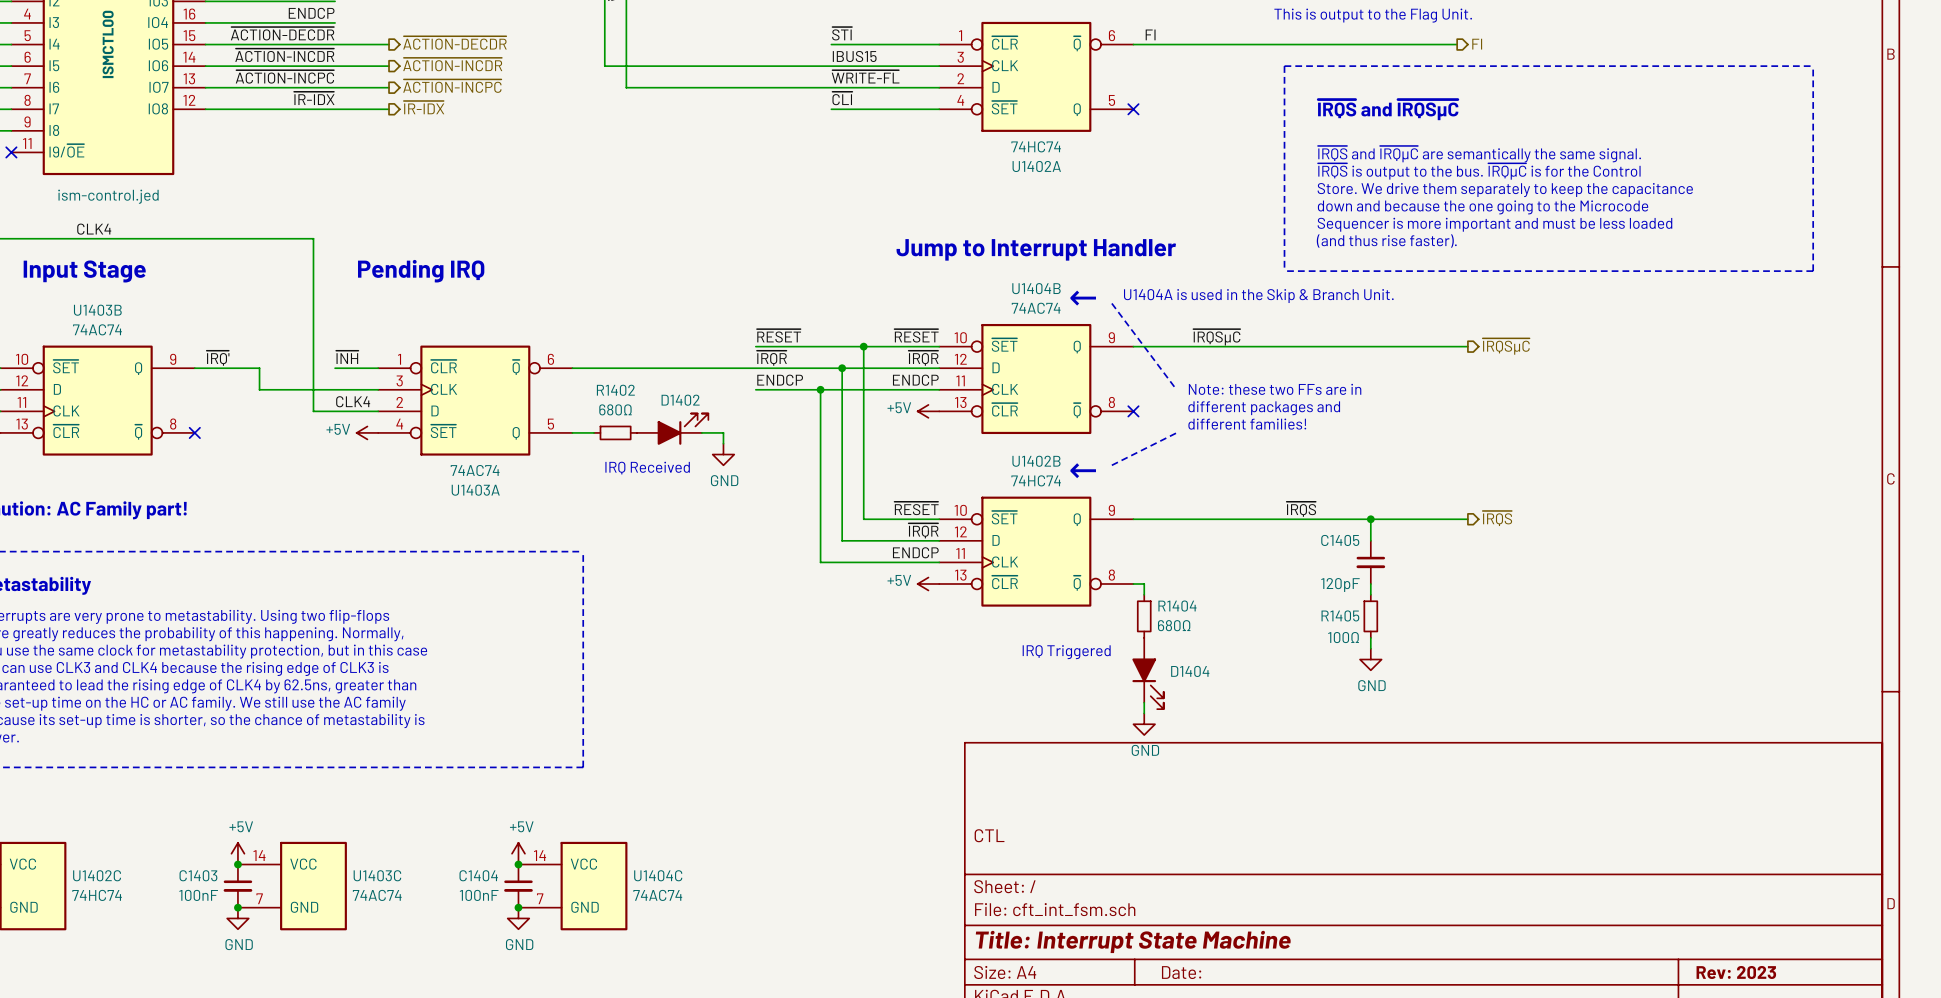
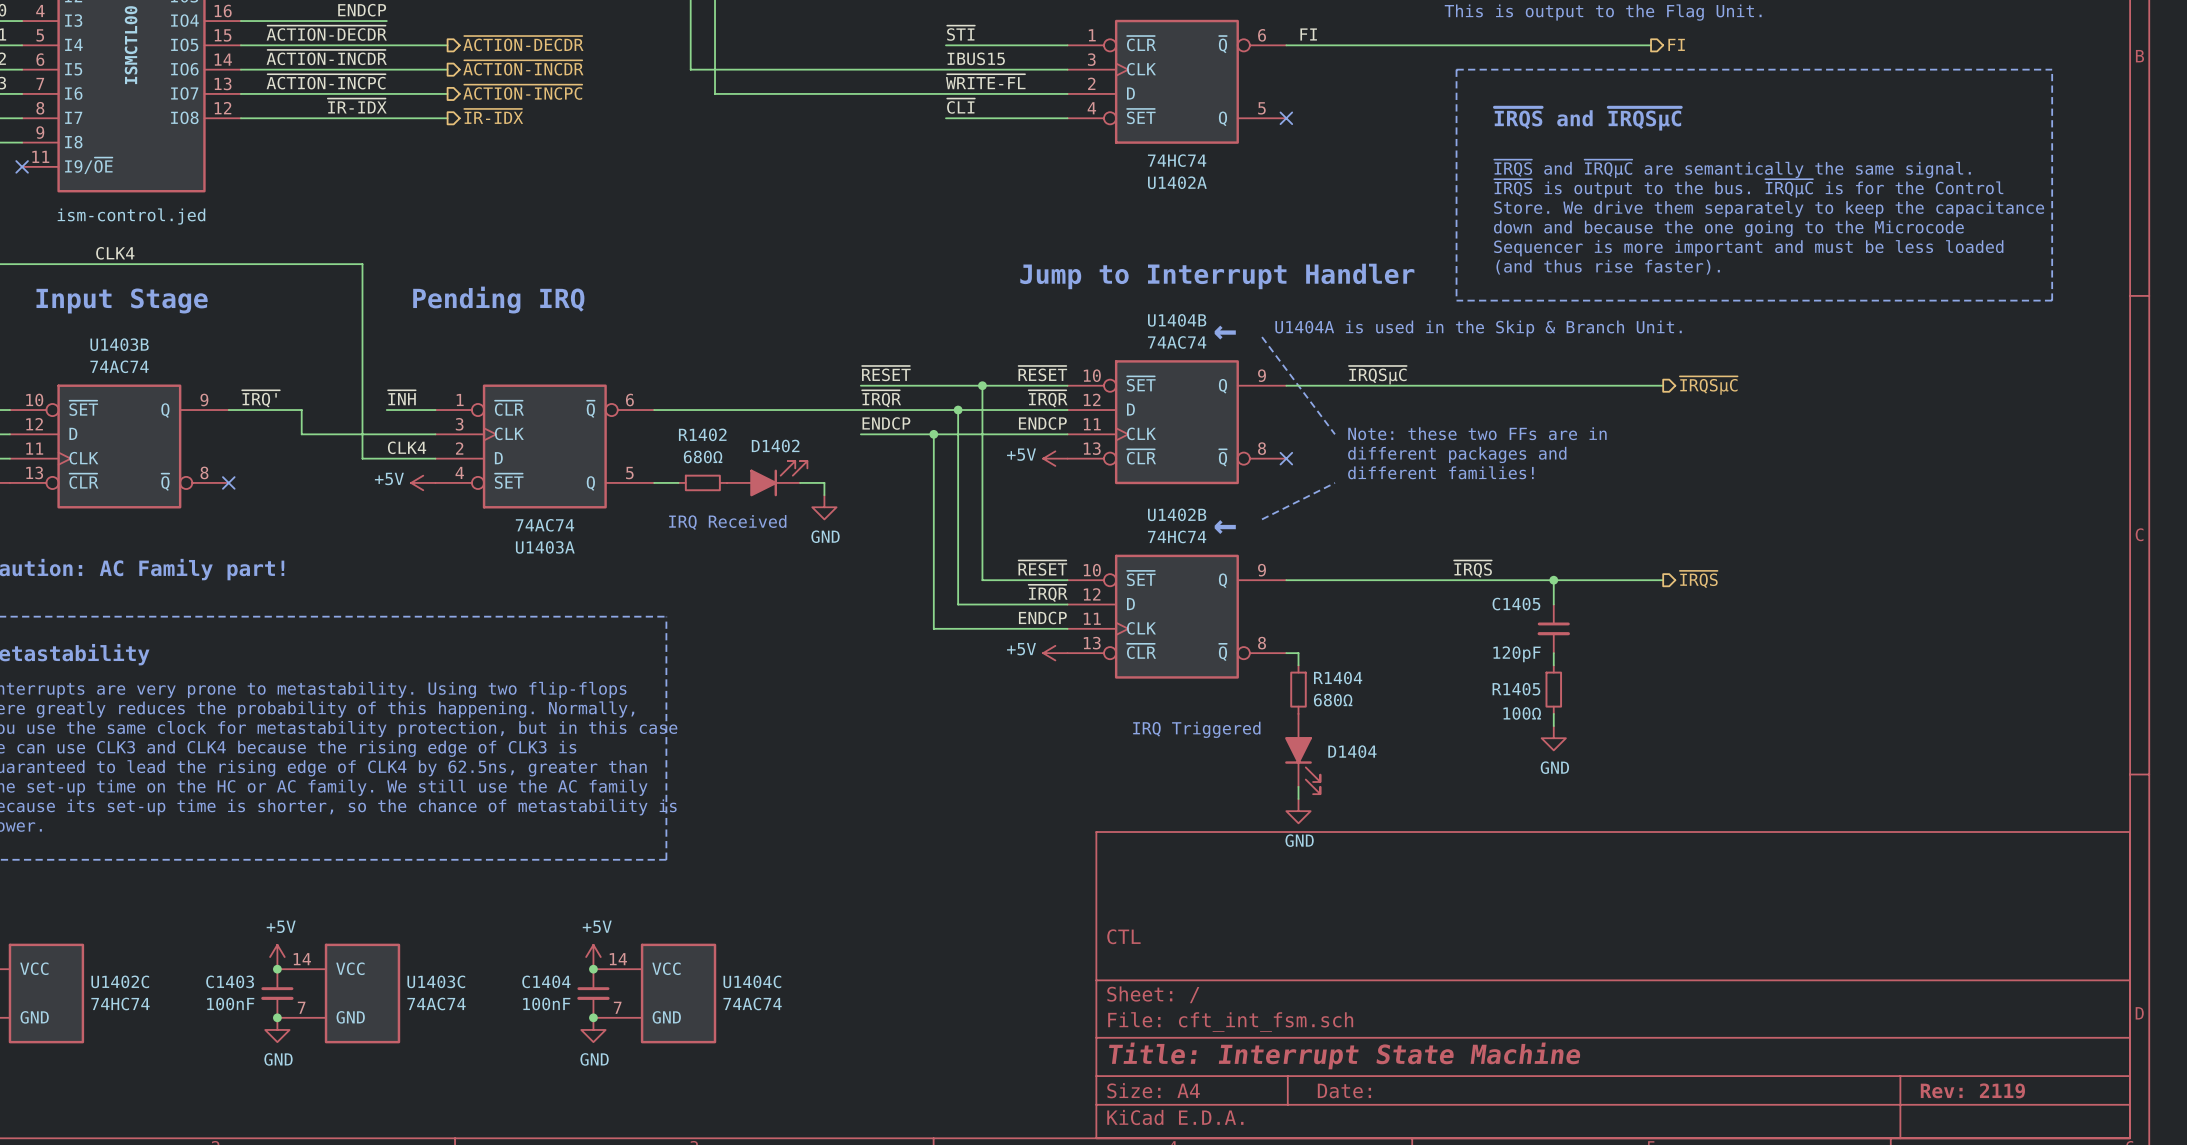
title block: Rev: 2023 (1736, 972) -> Rev: 2119 (1972, 1090)

